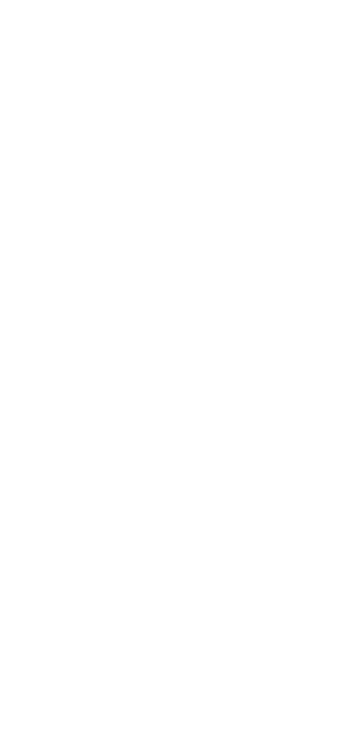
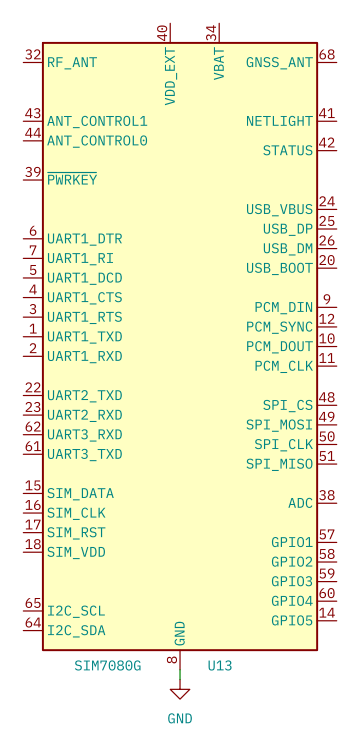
U13: none -> SIM7080G (180, 346)
wire: none -> (180, 669) (180, 679)
power symbol: none -> GND (180, 689)

